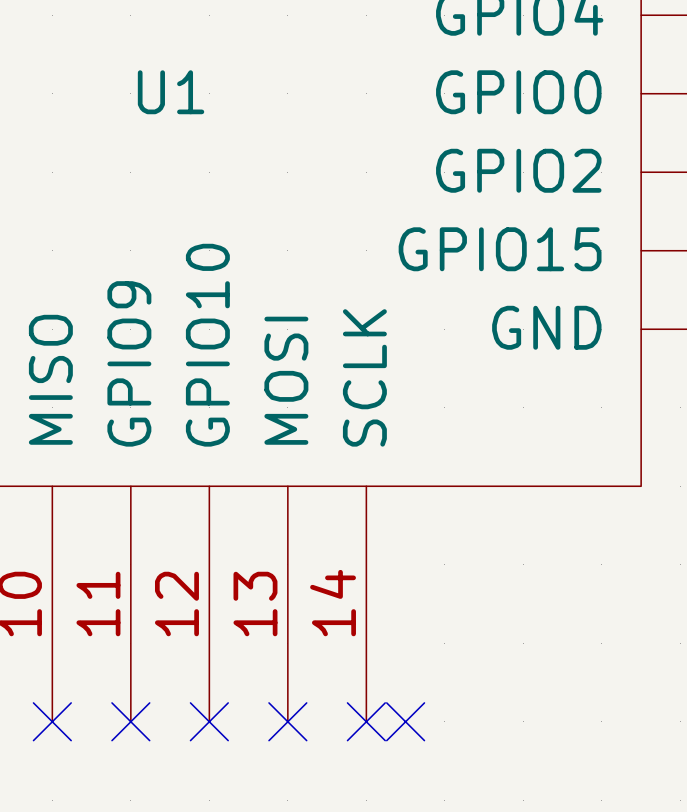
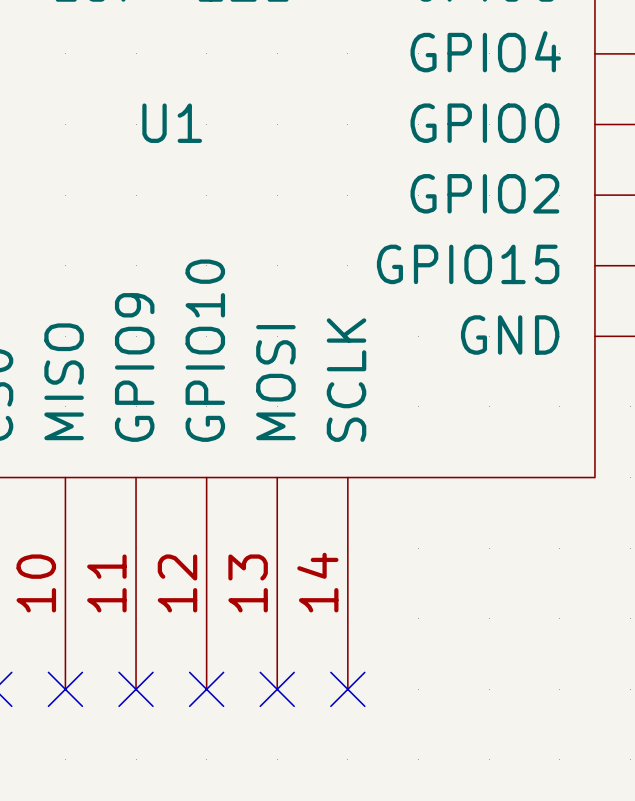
no-connect mark: (405, 721) -> none

